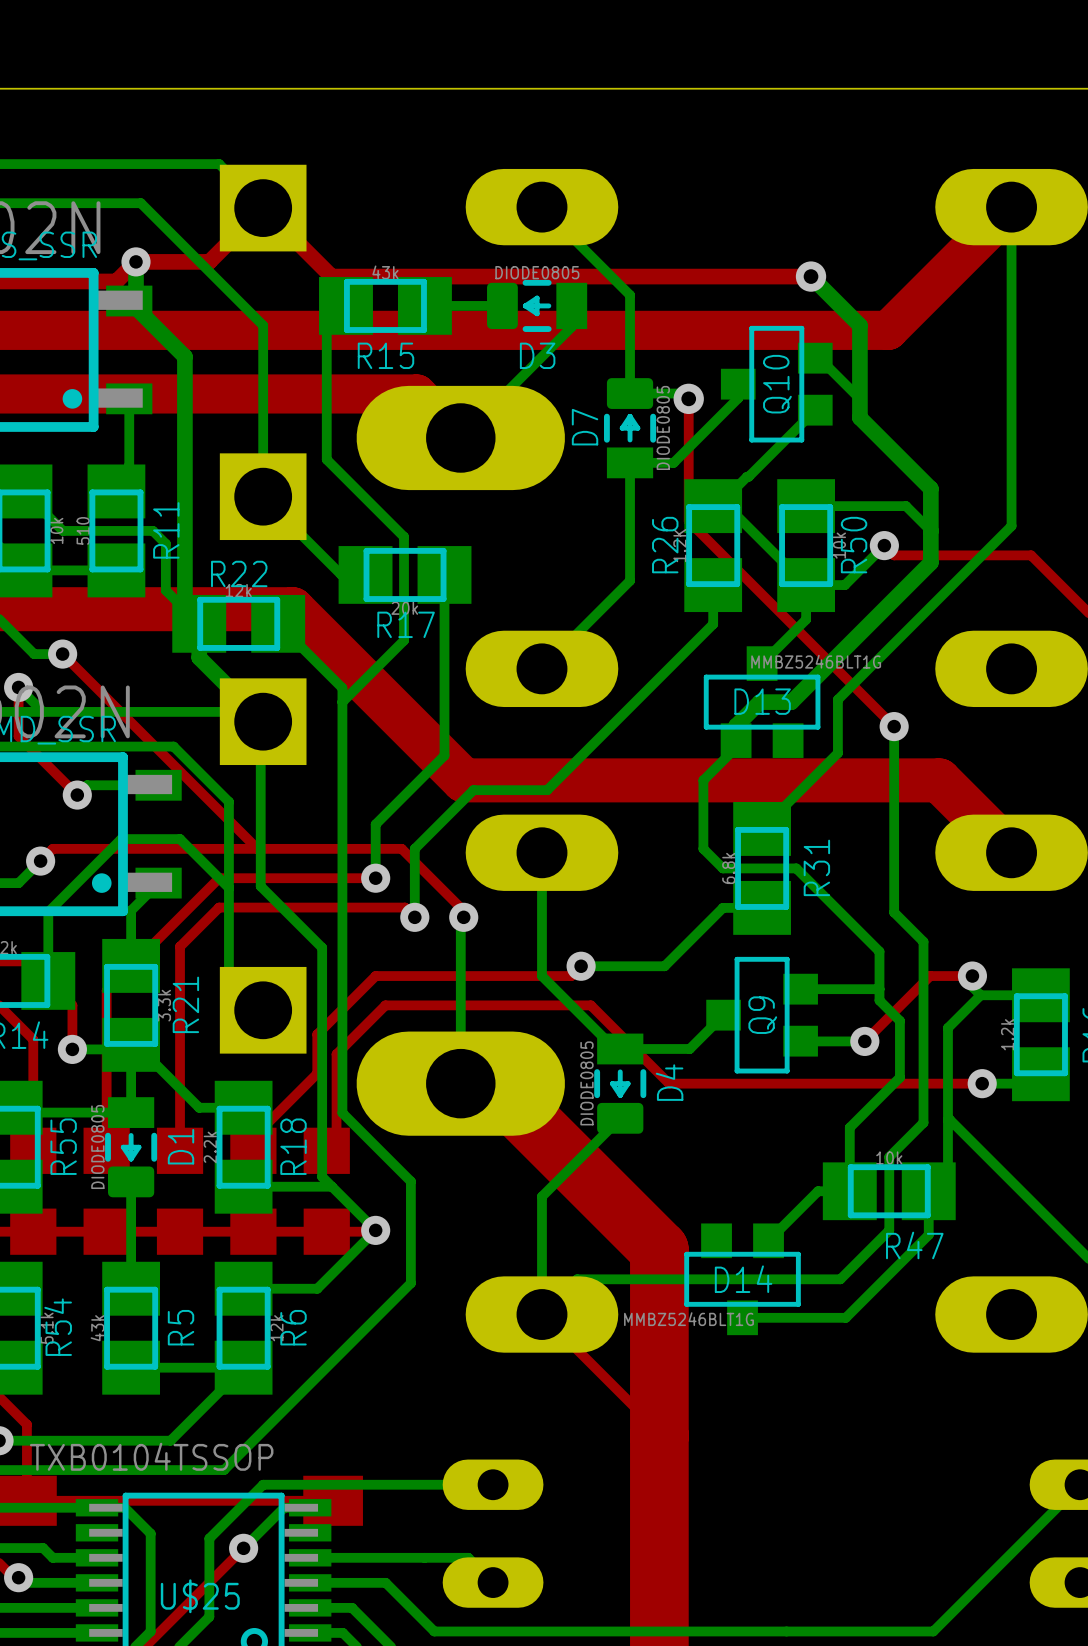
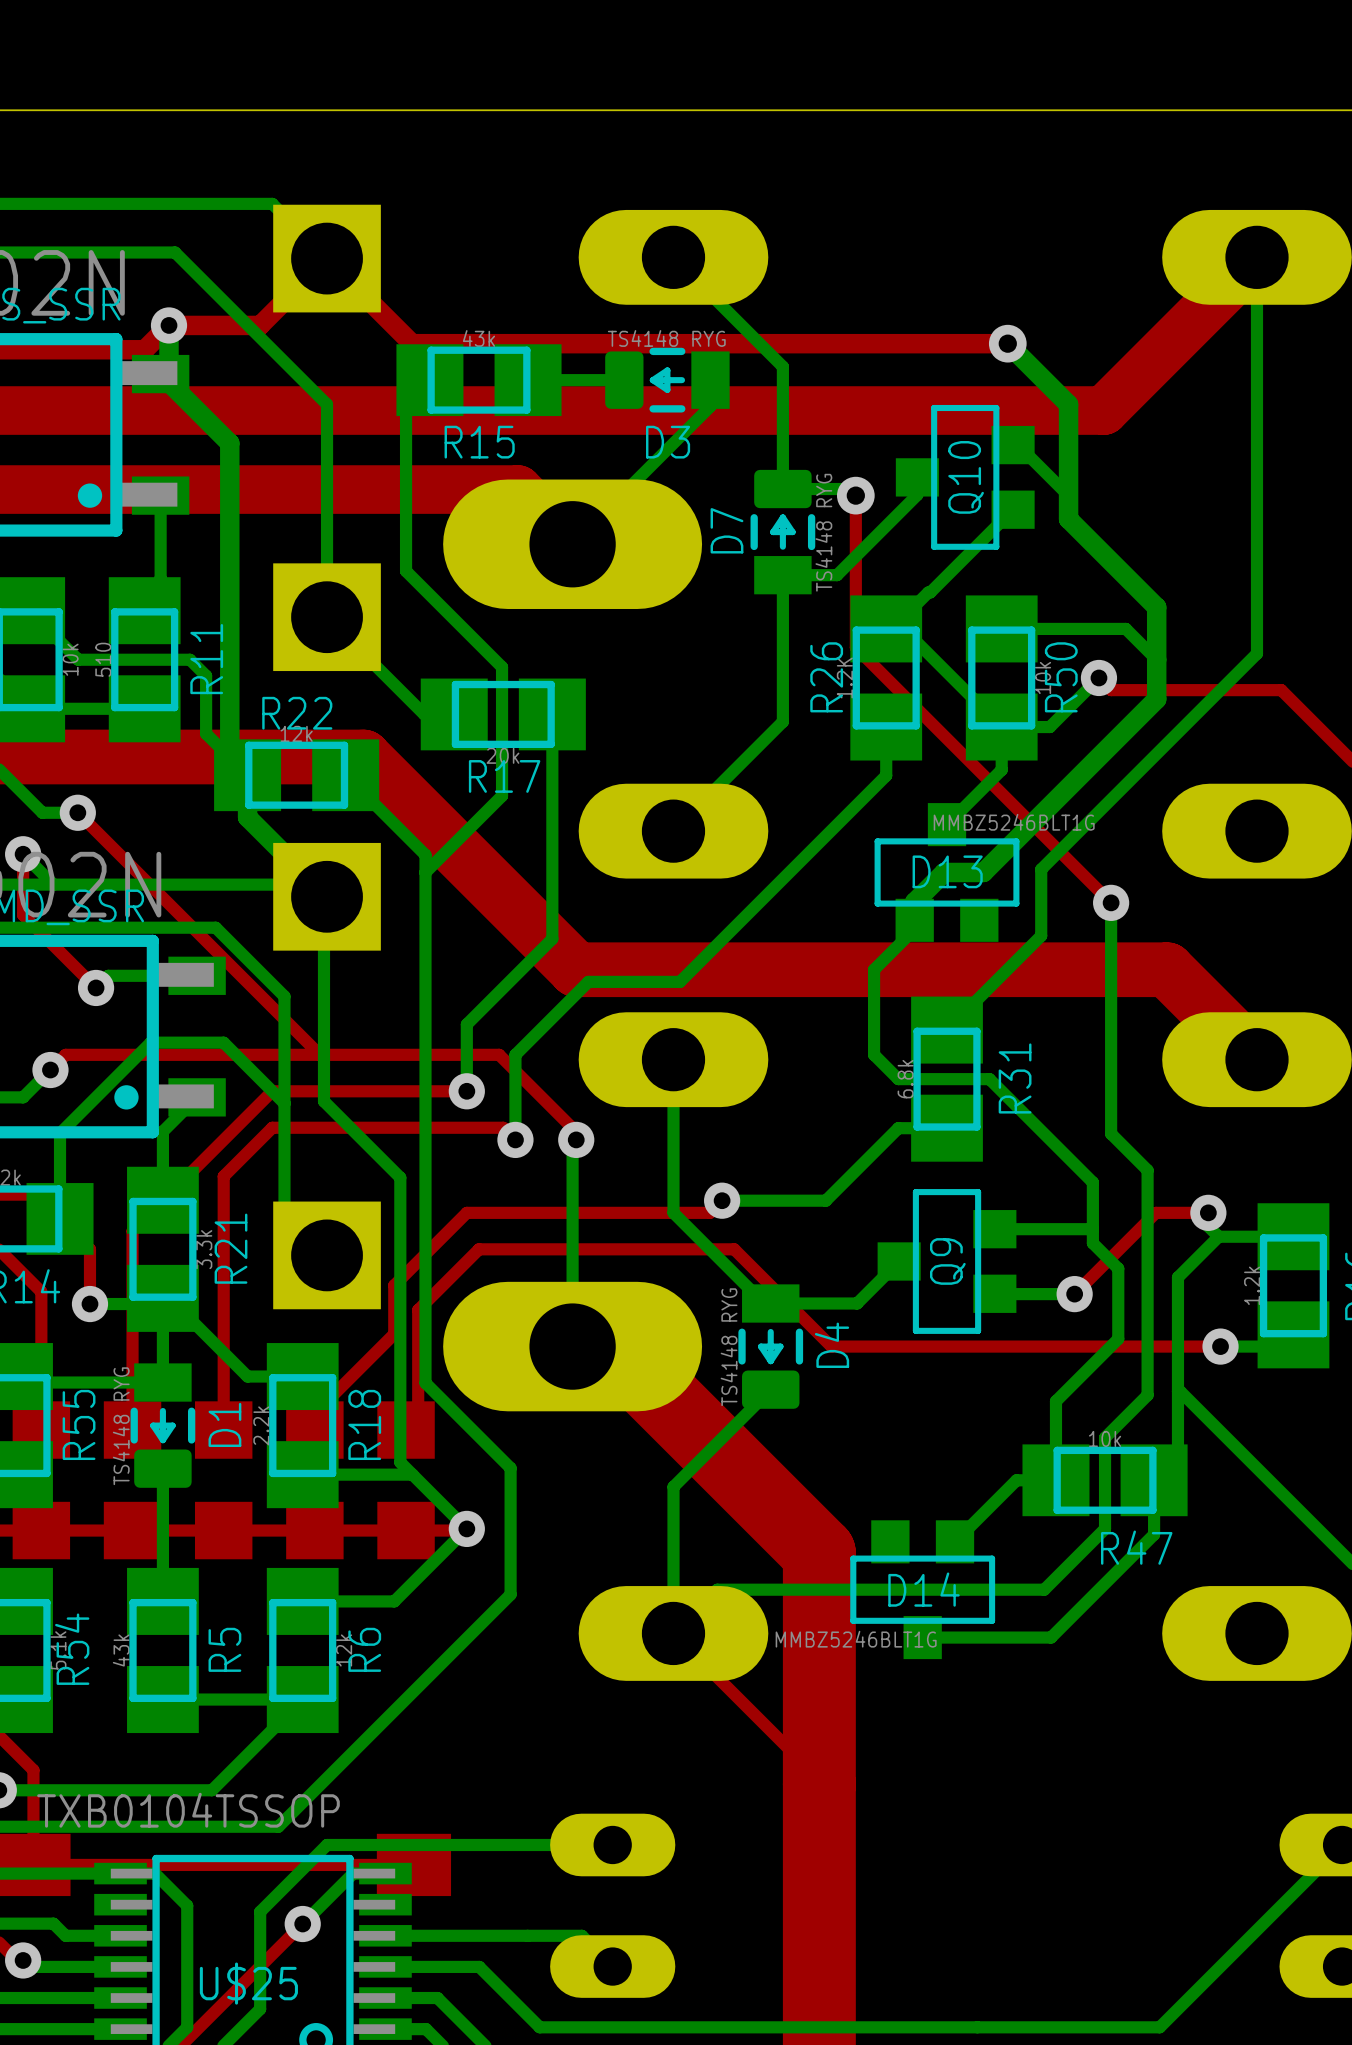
D3 value: DIODE0805 (537, 272) -> TS4148 RYG (666, 338)
D7 value: DIODE0805 (663, 427) -> TS4148 RYG (823, 532)
D4 value: DIODE0805 (586, 1083) -> TS4148 RYG (729, 1347)
D1 value: DIODE0805 (97, 1146) -> TS4148 RYG (121, 1426)

